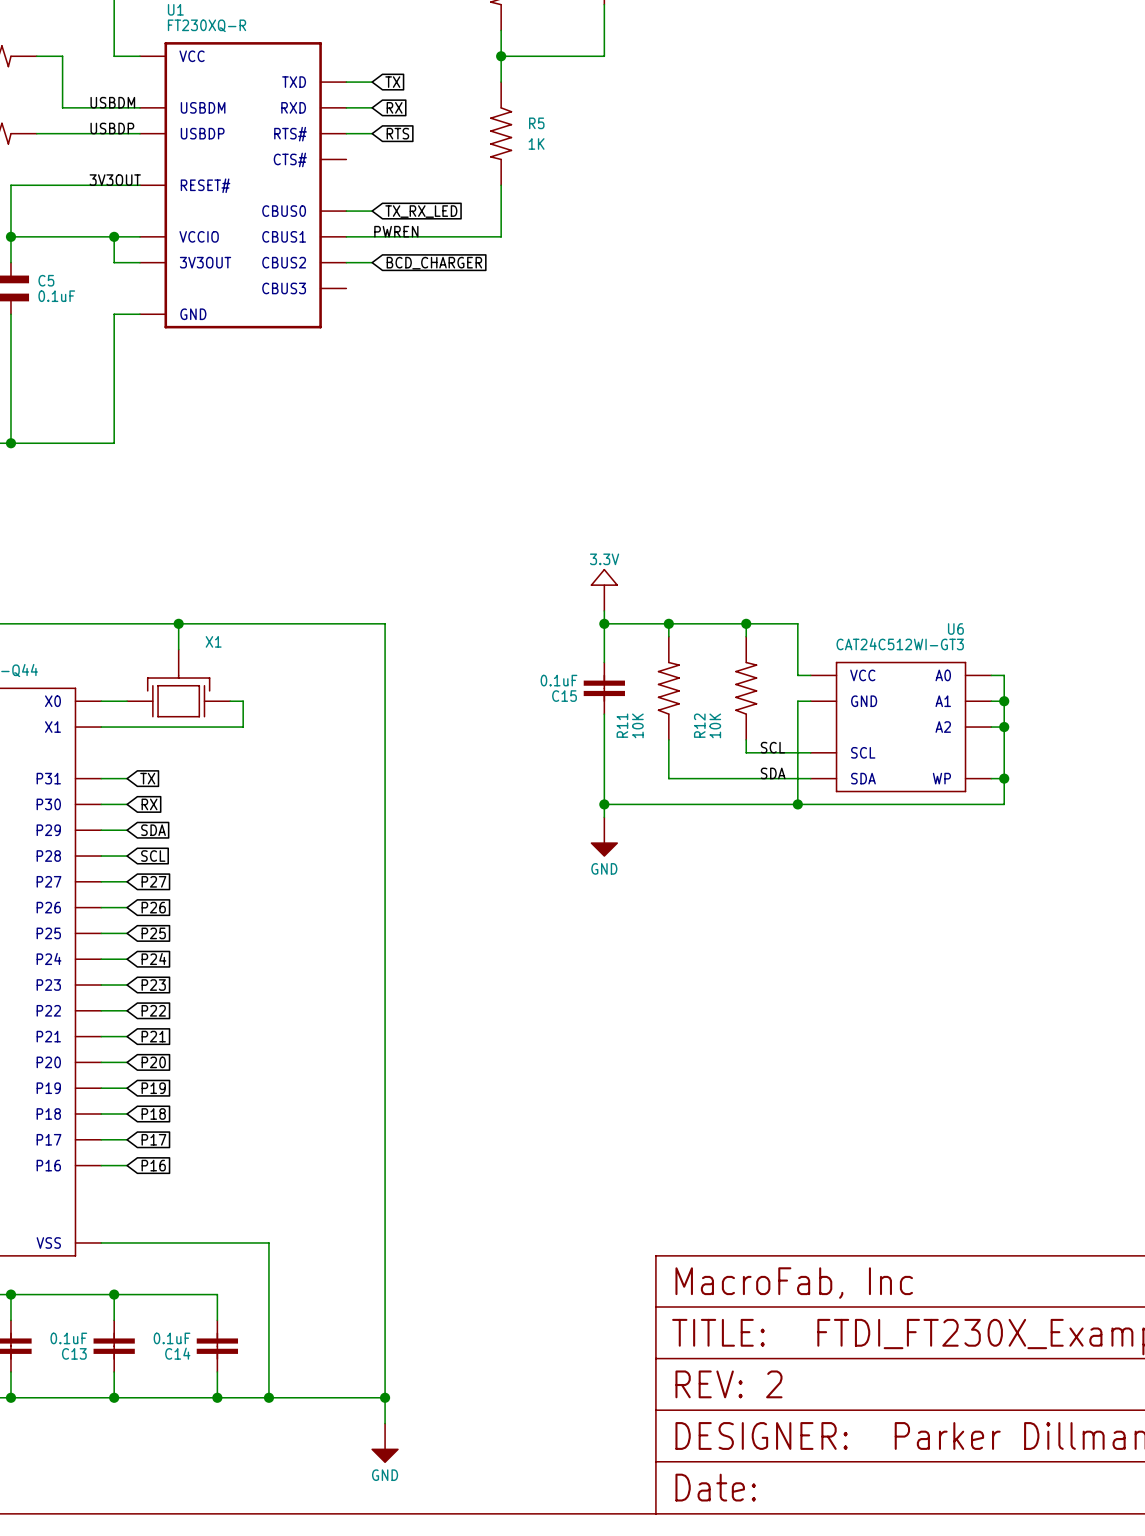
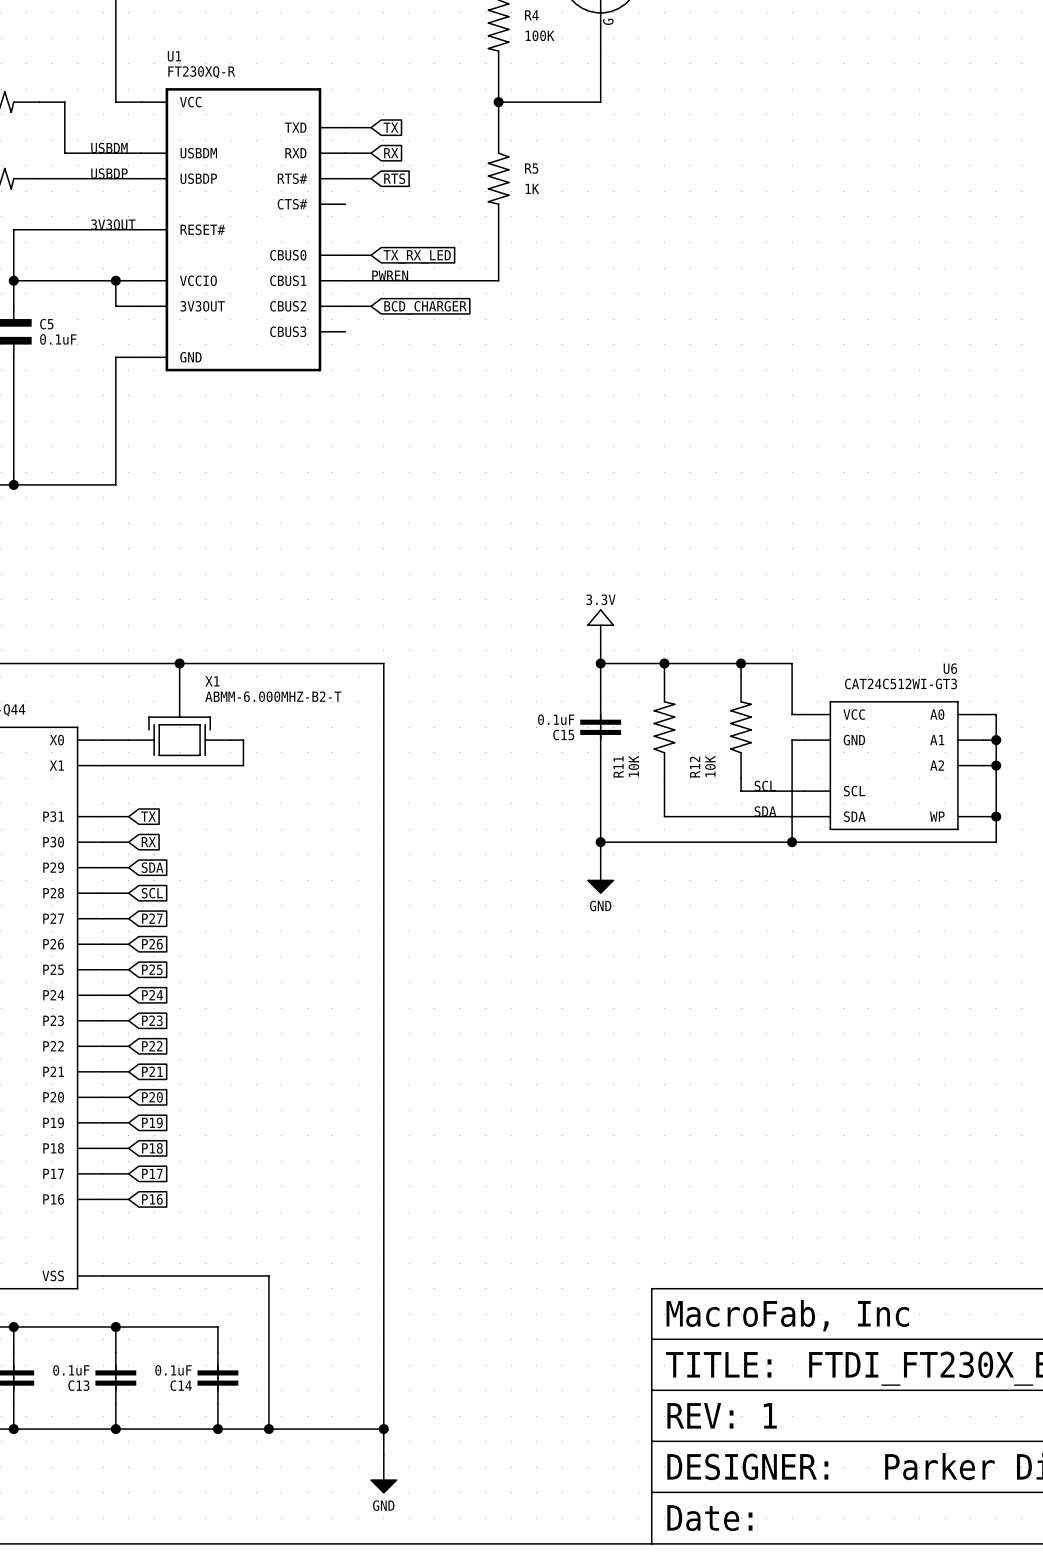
X1 value: none -> ABMM-6.000MHZ-B2-T (273, 696)
part text: REV: 2 (728, 1384) -> REV: 1 (722, 1415)

